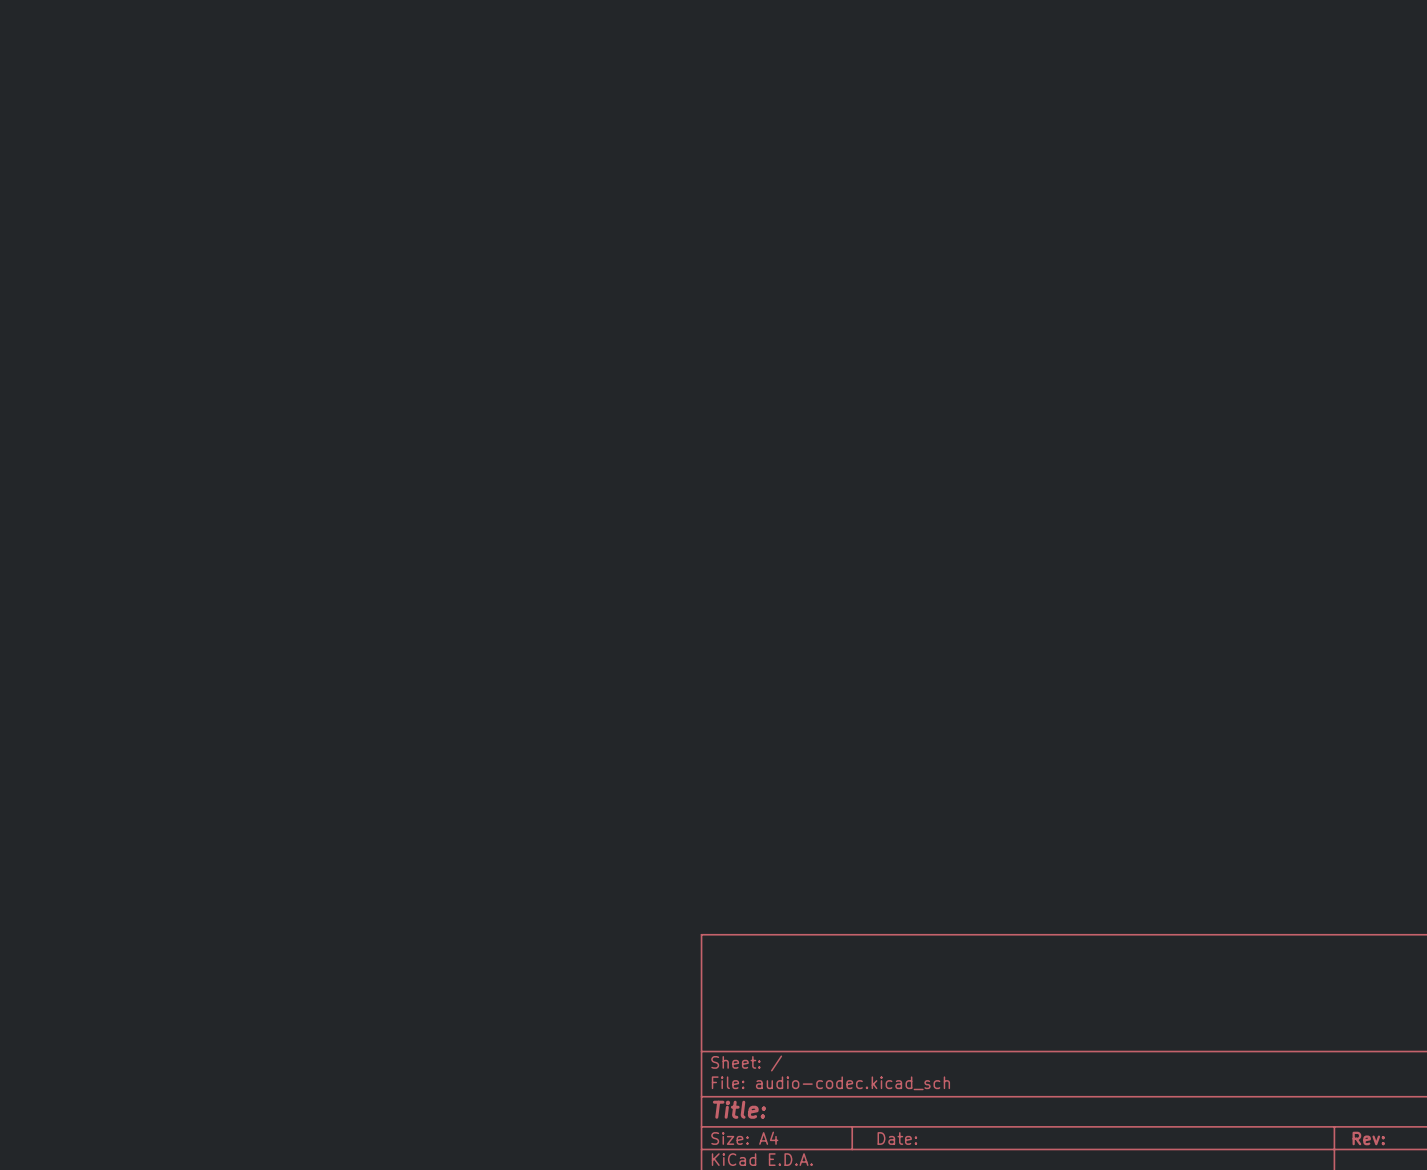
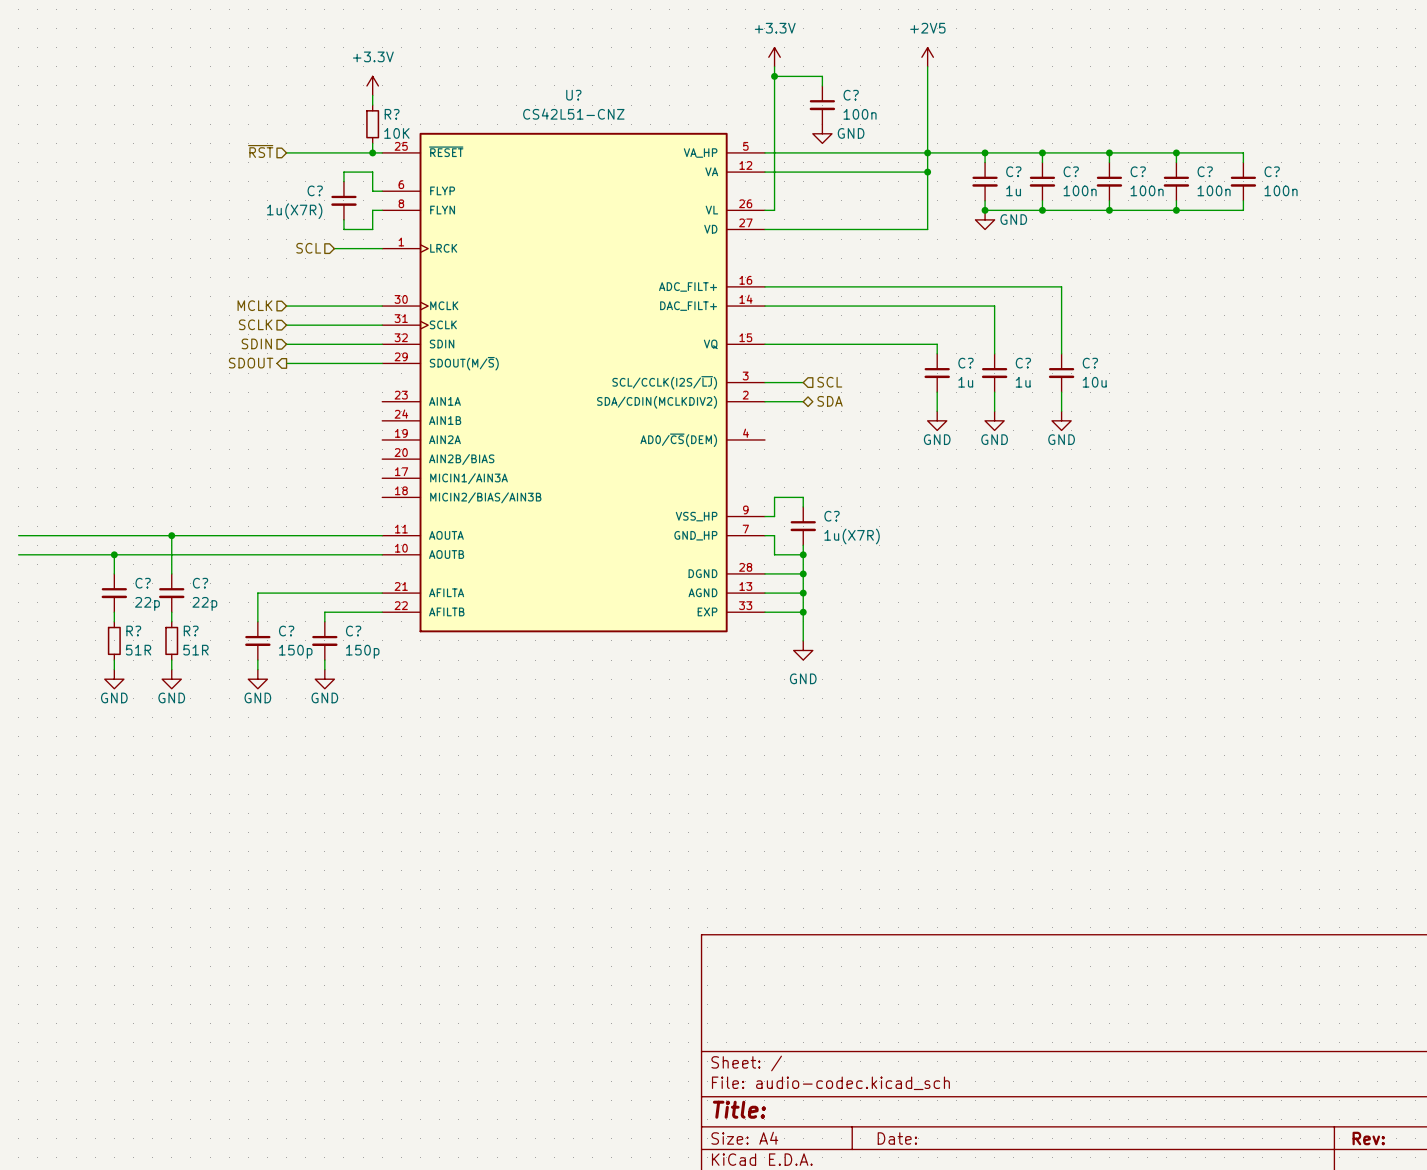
power symbol: none -> +3.3V (774, 57)
power symbol: none -> +2V5 (927, 57)
wire: none -> (774, 66) (774, 210) (764, 210)
wire: none -> (927, 66) (927, 229) (764, 229)
wire: none -> (774, 76) (822, 76) (822, 85)
junction: none -> (774, 76)
power symbol: none -> +3.3V (372, 85)
wire: none -> (372, 95) (372, 105)
C?: none -> 100n (822, 105)
R?: none -> 10K (372, 124)
power symbol: none -> GND (822, 133)
wire: none -> (372, 143) (372, 152)
hierarchical label: none -> ~{RST} (260, 151)
wire: none -> (286, 152) (382, 152)
junction: none -> (372, 152)
wire: none -> (764, 152) (1243, 152) (1243, 162)
junction: none -> (927, 152)
wire: none -> (985, 152) (985, 162)
junction: none -> (985, 152)
wire: none -> (1042, 152) (1042, 162)
junction: none -> (1042, 152)
wire: none -> (1109, 152) (1109, 162)
junction: none -> (1109, 152)
wire: none -> (1176, 152) (1176, 162)
junction: none -> (1176, 152)
wire: none -> (764, 172) (927, 172)
junction: none -> (927, 172)
wire: none -> (343, 181) (343, 172) (372, 172) (372, 191) (382, 191)
C?: none -> 1u (985, 181)
C?: none -> 100n (1042, 181)
C?: none -> 100n (1109, 181)
C?: none -> 100n (1176, 181)
C?: none -> 100n (1243, 181)
C?: none -> 1u(X7R) (343, 200)
wire: none -> (985, 200) (985, 210) (1243, 210) (1243, 200)
wire: none -> (1042, 200) (1042, 210)
wire: none -> (1109, 200) (1109, 210)
wire: none -> (1176, 200) (1176, 210)
wire: none -> (382, 210) (372, 210) (372, 229) (343, 229) (343, 219)
junction: none -> (985, 210)
junction: none -> (1042, 210)
junction: none -> (1109, 210)
junction: none -> (1176, 210)
power symbol: none -> GND (985, 219)
hierarchical label: none -> SCL (308, 248)
wire: none -> (334, 248) (382, 248)
wire: none -> (764, 286) (1061, 286) (1061, 353)
hierarchical label: none -> MCLK (254, 305)
wire: none -> (286, 306) (382, 306)
wire: none -> (764, 306) (994, 306) (994, 353)
hierarchical label: none -> SCLK (255, 324)
wire: none -> (286, 325) (382, 325)
hierarchical label: none -> SDIN (256, 343)
wire: none -> (286, 344) (382, 344)
wire: none -> (764, 344) (937, 344) (937, 353)
hierarchical label: none -> SDOUT (251, 363)
wire: none -> (286, 363) (382, 363)
C?: none -> 1u (937, 373)
C?: none -> 1u (994, 373)
C?: none -> 10u (1061, 373)
U?: none -> CS42L51-CNZ (573, 382)
wire: none -> (764, 382) (803, 382)
hierarchical label: none -> SCL (829, 382)
wire: none -> (937, 392) (937, 411)
wire: none -> (994, 392) (994, 411)
wire: none -> (1061, 392) (1061, 411)
wire: none -> (764, 401) (803, 401)
hierarchical label: none -> SDA (830, 401)
power symbol: none -> GND (937, 420)
power symbol: none -> GND (994, 420)
power symbol: none -> GND (1061, 420)
wire: none -> (803, 506) (803, 497) (774, 497) (774, 516) (764, 516)
C?: none -> 1u(X7R) (803, 526)
wire: none -> (18, 535) (382, 535)
wire: none -> (171, 535) (171, 573)
junction: none -> (171, 535)
wire: none -> (764, 535) (774, 535) (774, 554) (803, 554)
wire: none -> (803, 545) (803, 640)
wire: none -> (18, 554) (382, 554)
wire: none -> (114, 554) (114, 573)
junction: none -> (114, 554)
junction: none -> (803, 554)
wire: none -> (764, 573) (803, 573)
junction: none -> (803, 573)
C?: none -> 22p (114, 593)
C?: none -> 22p (171, 593)
wire: none -> (382, 593) (257, 593) (257, 621)
wire: none -> (764, 593) (803, 593)
junction: none -> (803, 593)
wire: none -> (114, 612) (114, 621)
wire: none -> (171, 612) (171, 621)
wire: none -> (382, 612) (324, 612) (324, 621)
wire: none -> (764, 612) (803, 612)
junction: none -> (803, 612)
R?: none -> 51R (114, 640)
R?: none -> 51R (171, 640)
C?: none -> 150p (257, 640)
C?: none -> 150p (324, 640)
power symbol: none -> GND (803, 650)
wire: none -> (114, 660) (114, 669)
wire: none -> (171, 660) (171, 669)
wire: none -> (257, 660) (257, 669)
wire: none -> (324, 660) (324, 669)
power symbol: none -> GND (114, 679)
power symbol: none -> GND (171, 679)
power symbol: none -> GND (257, 679)
power symbol: none -> GND (324, 679)

